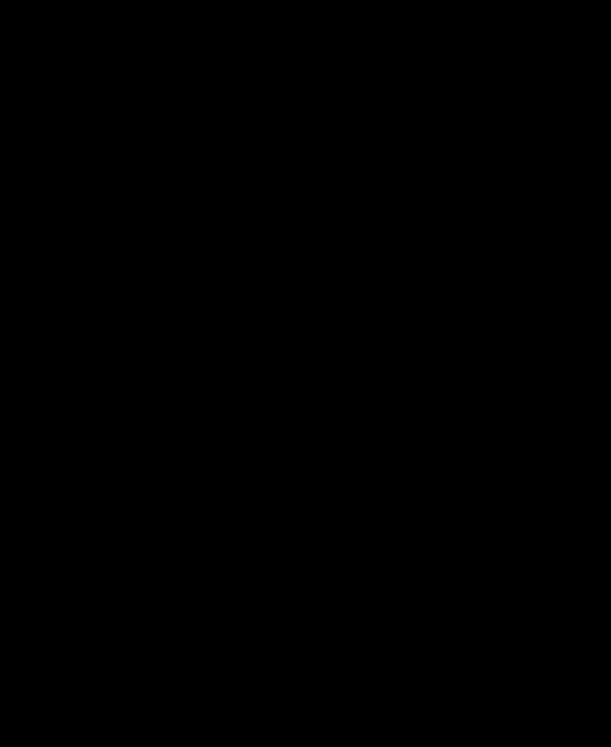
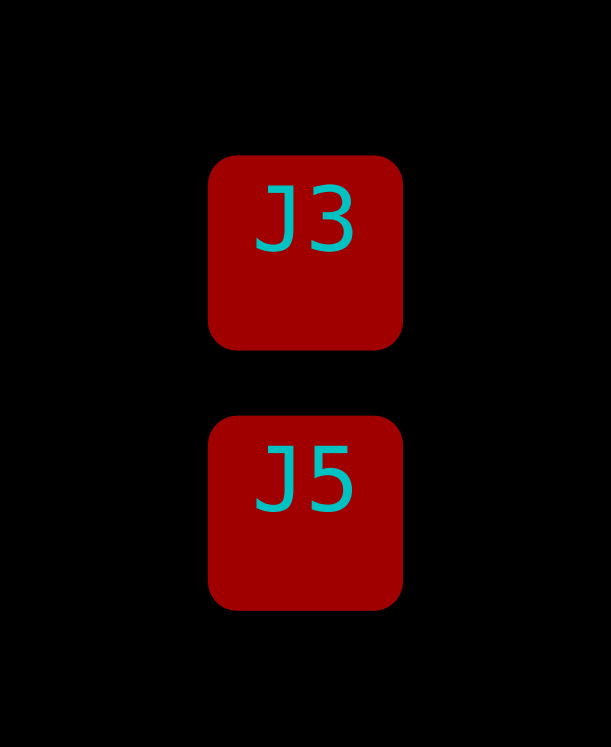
J3: none -> (305, 252)
J5: none -> (305, 513)

